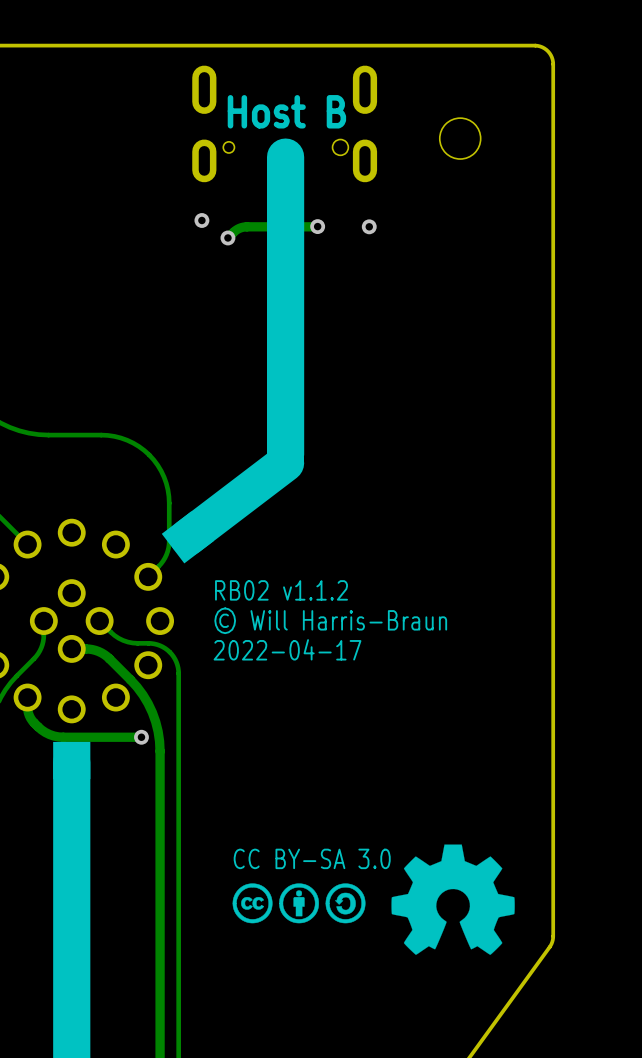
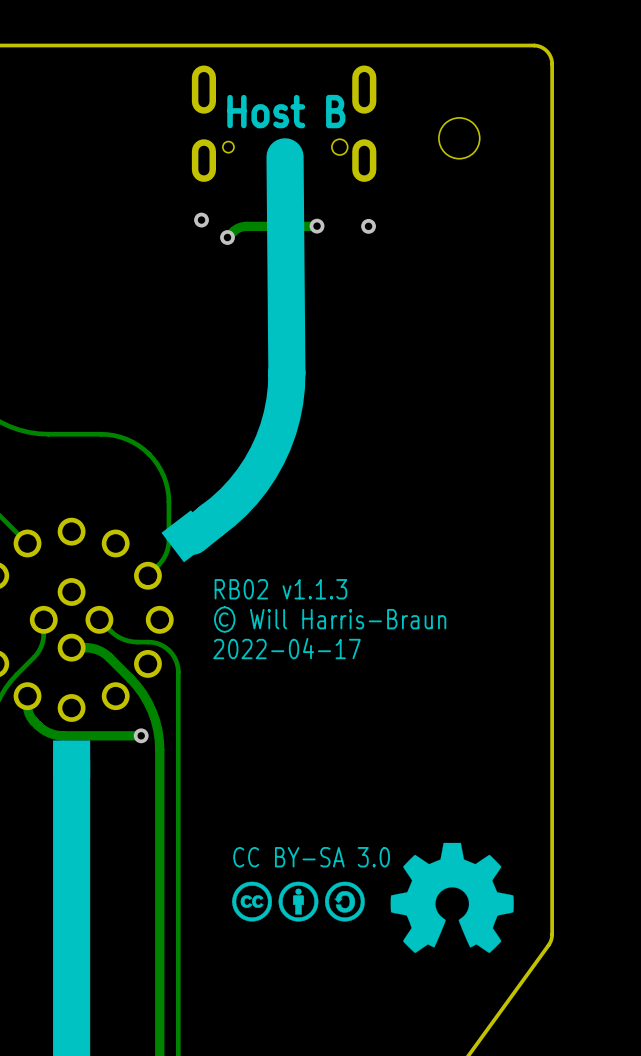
line: (285, 157) (285, 454) -> (285, 156) (286, 372) (282, 415) (273, 442) (252, 480) (233, 502) (192, 536)
line: (285, 462) (187, 537) -> none
text: RB02 v1.1.2 (281, 590) -> RB02 v1.1.3 (280, 589)

